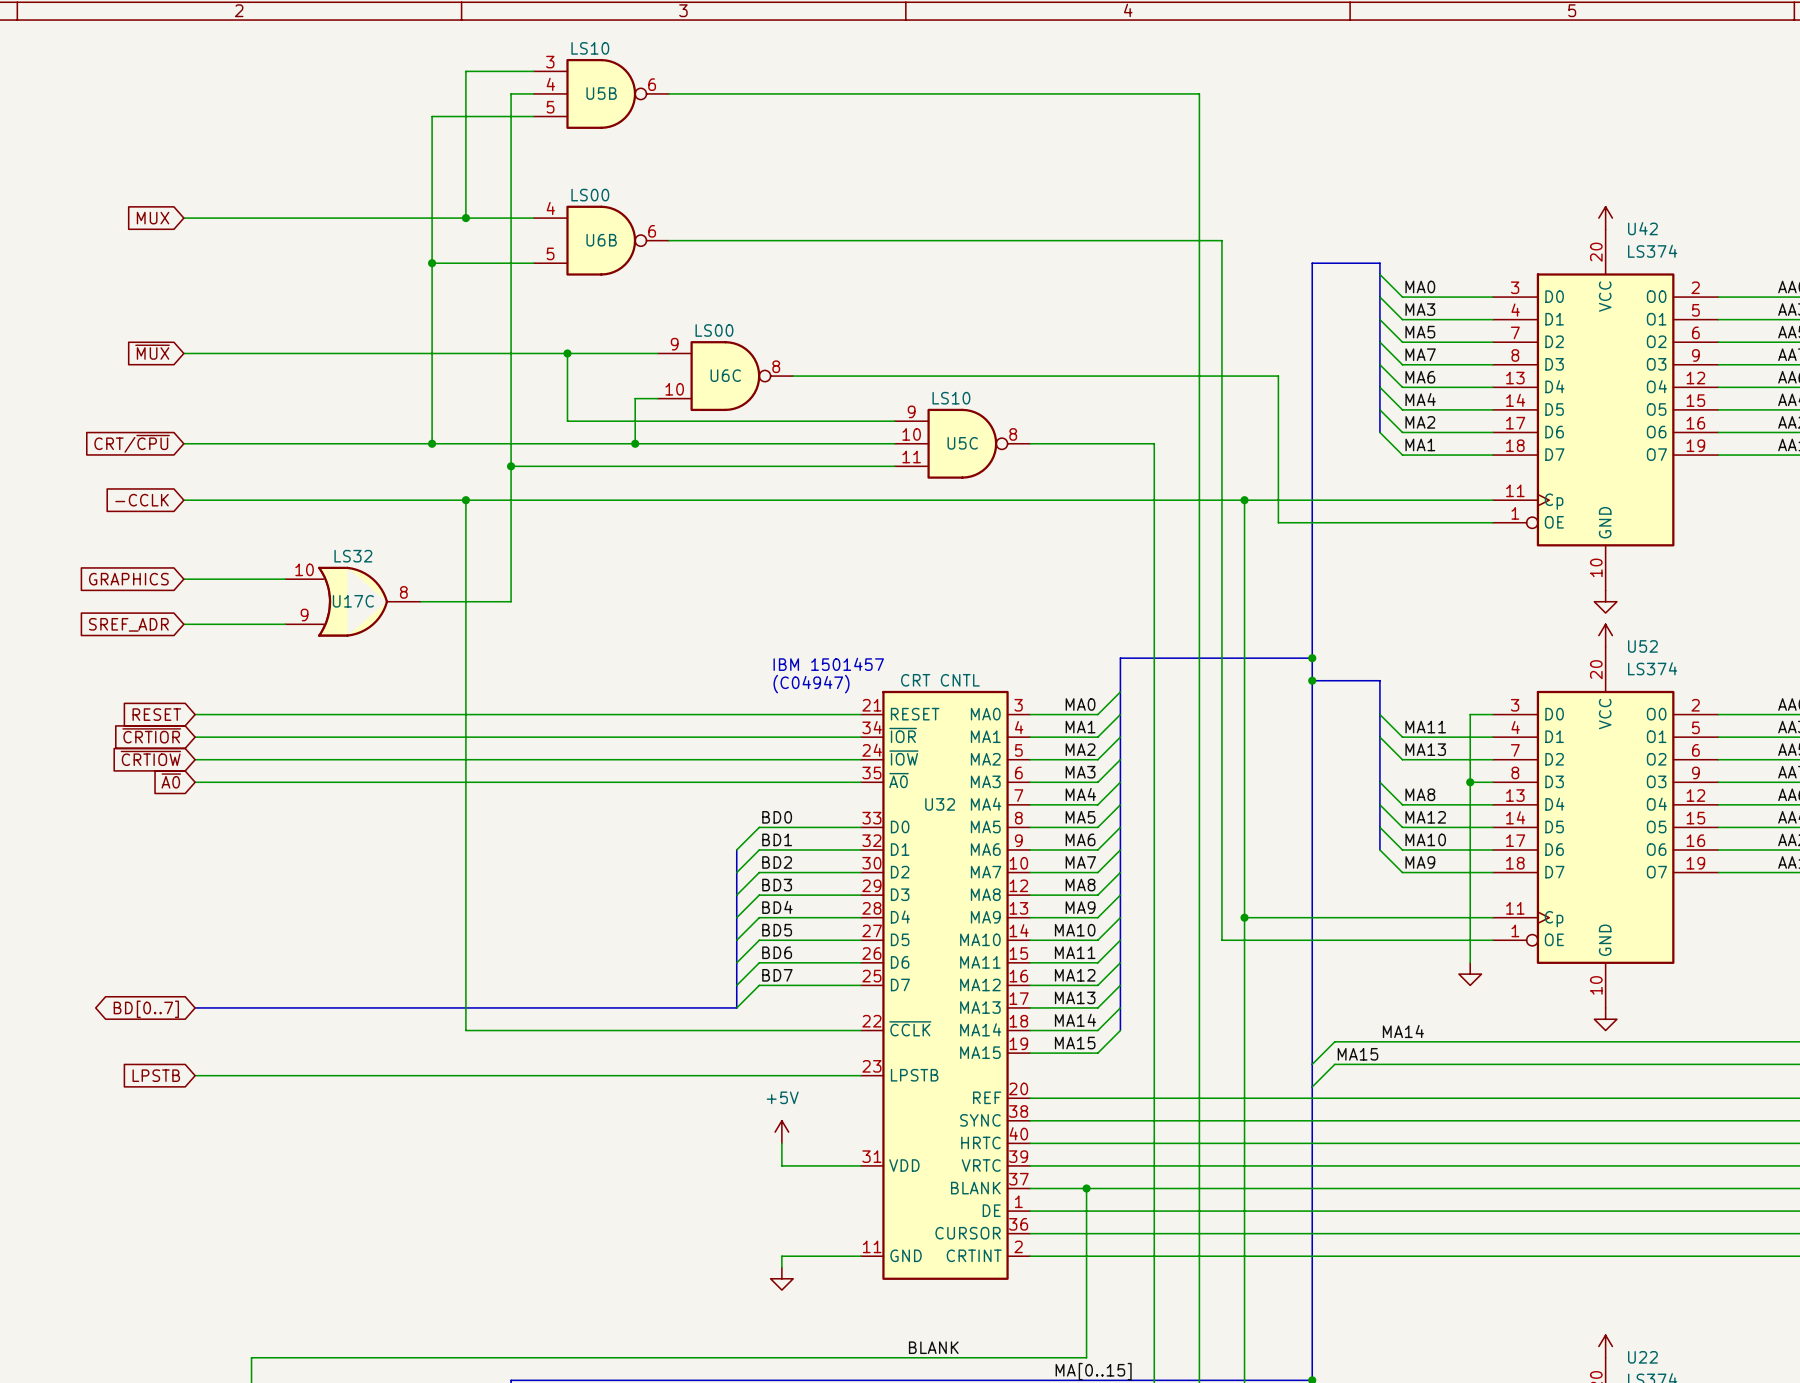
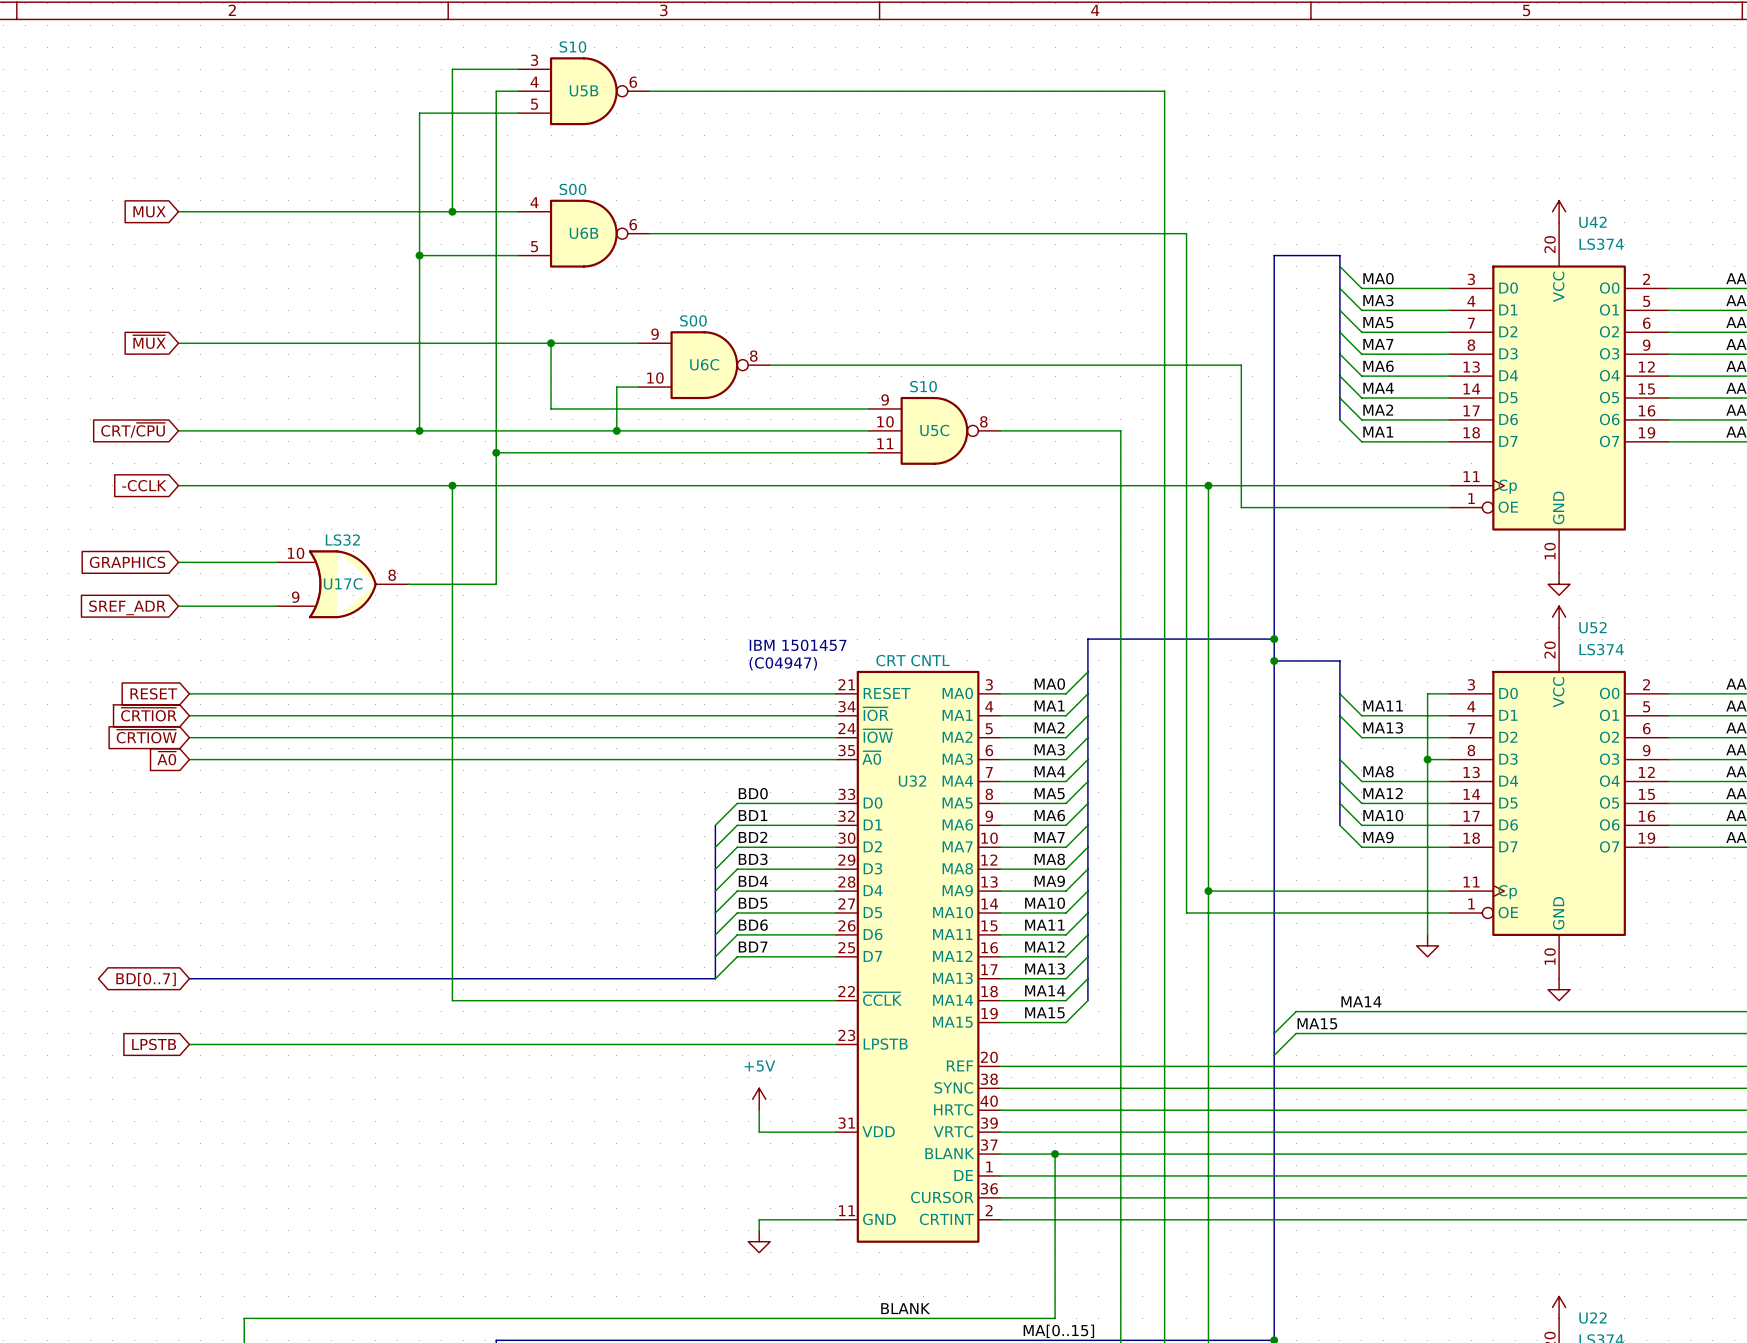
U5B value: LS10 (590, 48) -> S10 (572, 47)
U6B value: LS00 (590, 195) -> S00 (572, 189)
U6C value: LS00 (714, 330) -> S00 (693, 320)
U5C value: LS10 (951, 398) -> S10 (923, 386)

